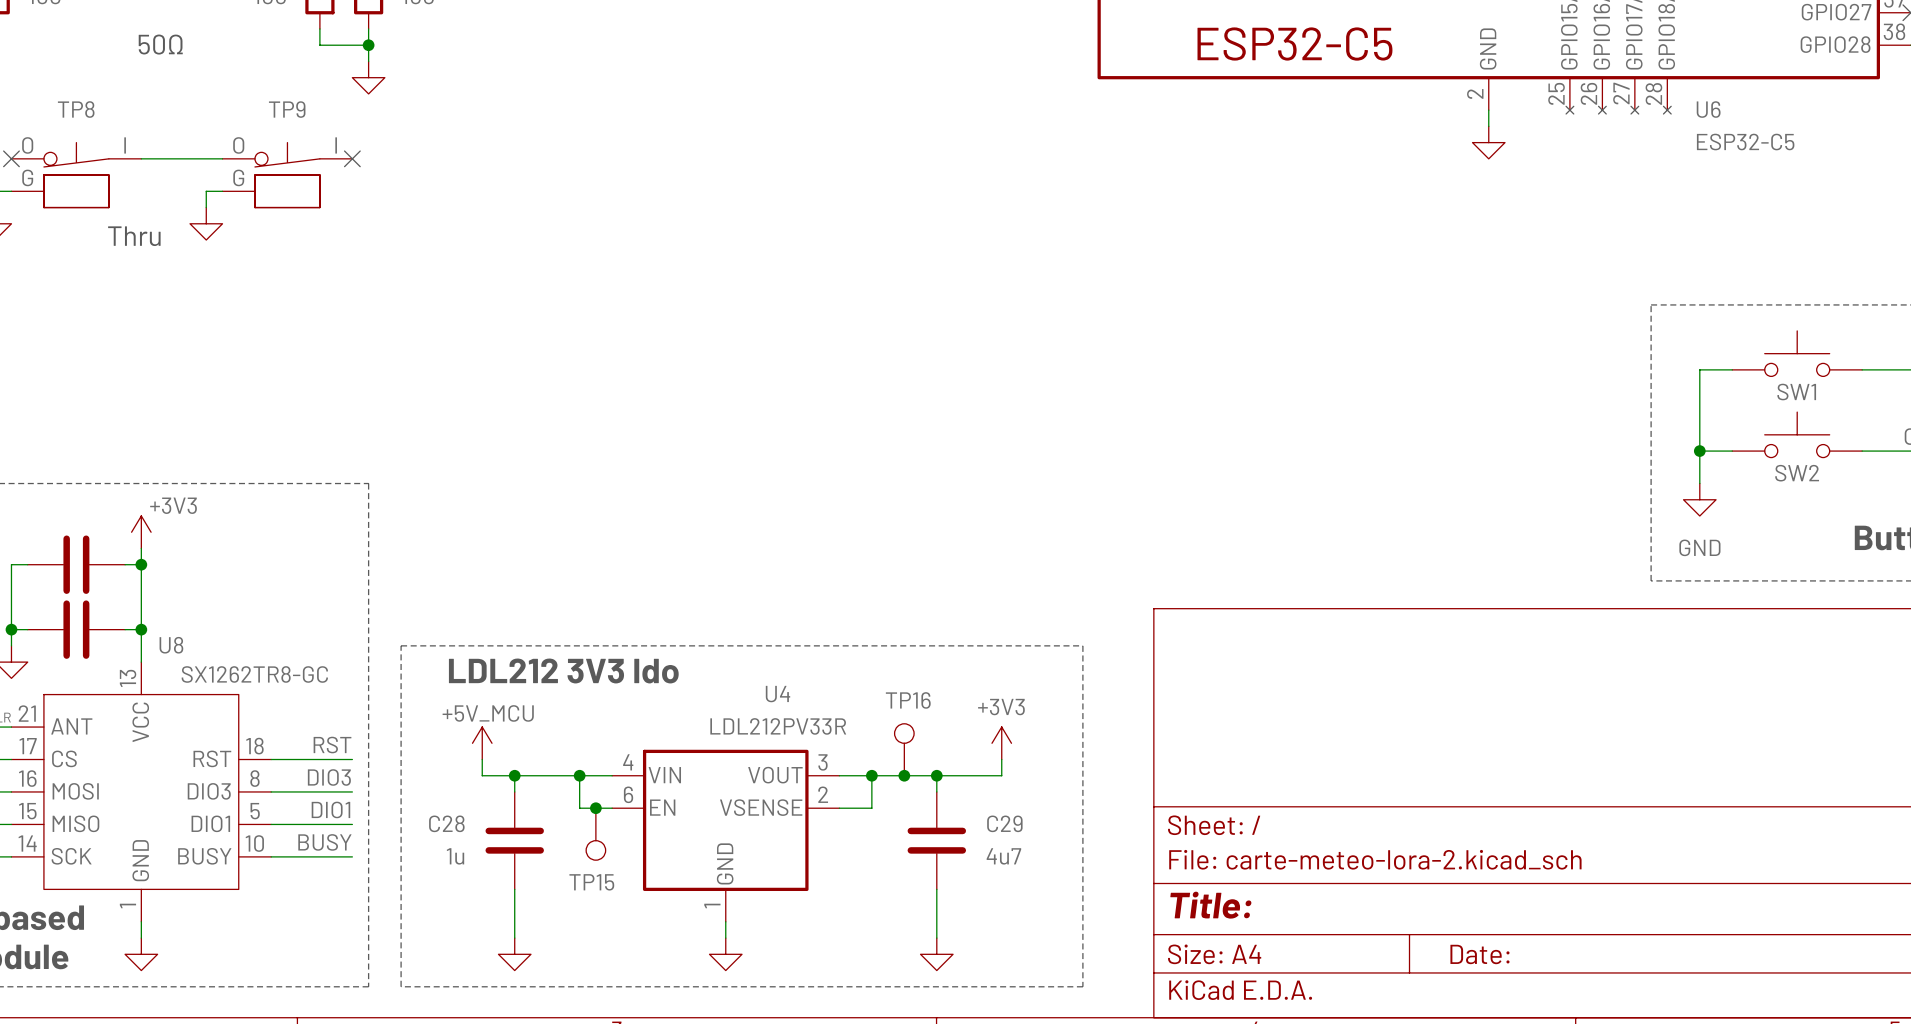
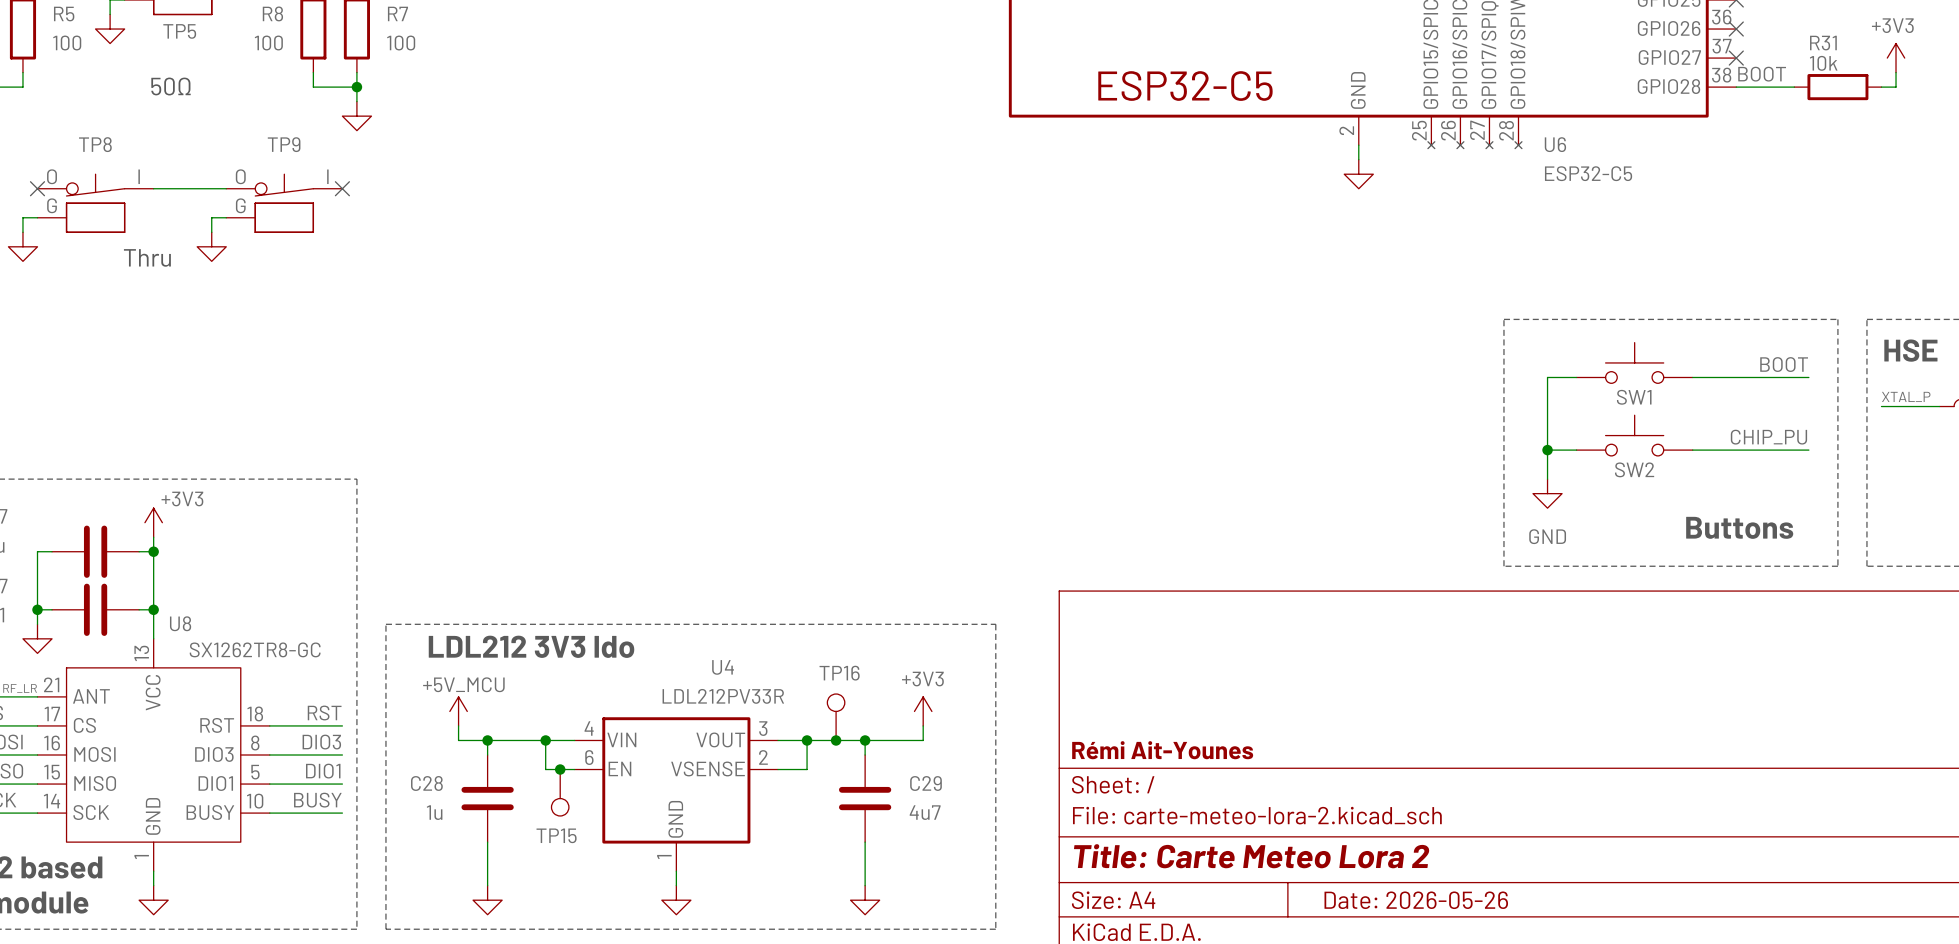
title block: none -> Rémi Ait-Younes (1162, 750)
title block: Title: (1210, 905) -> Title: Carte Meteo Lora 2 (1251, 856)
title block: Date: (1479, 954) -> Date: 2026-05-26 (1416, 900)

